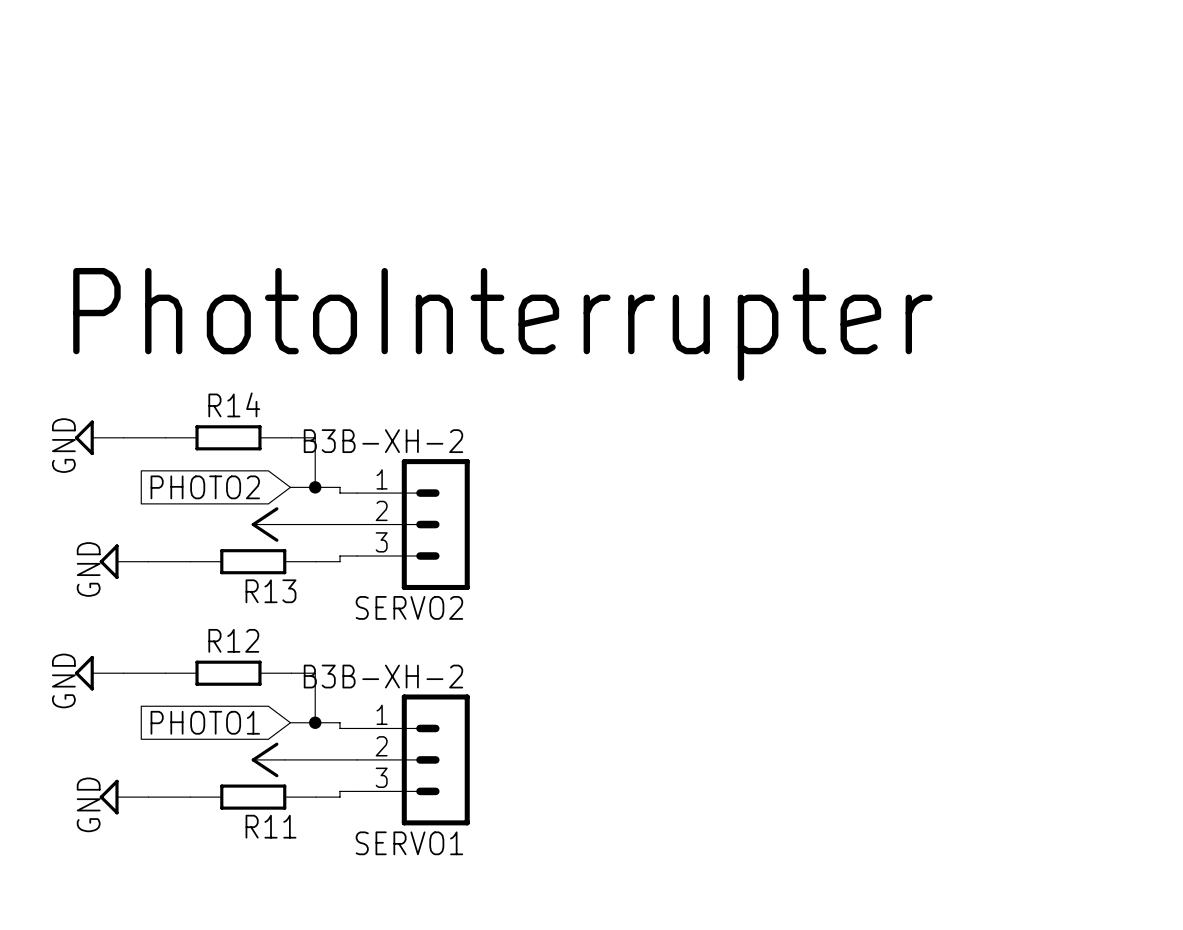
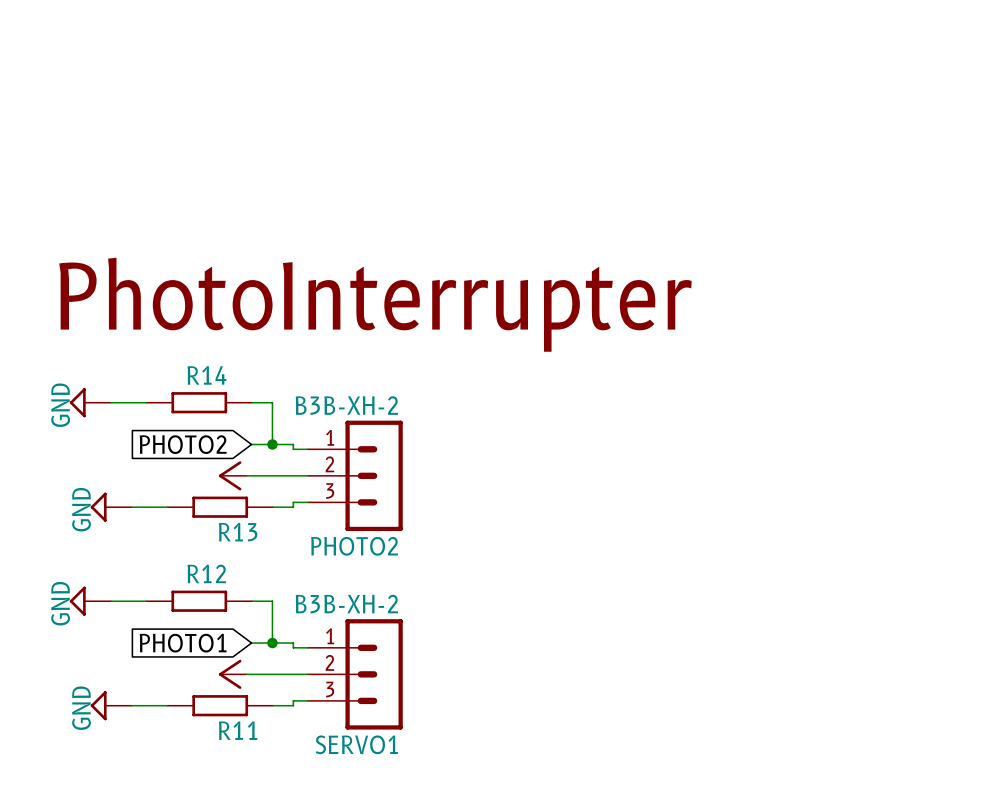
SERVO2 name: SERVO2 (409, 607) -> PHOTO2 (354, 546)

